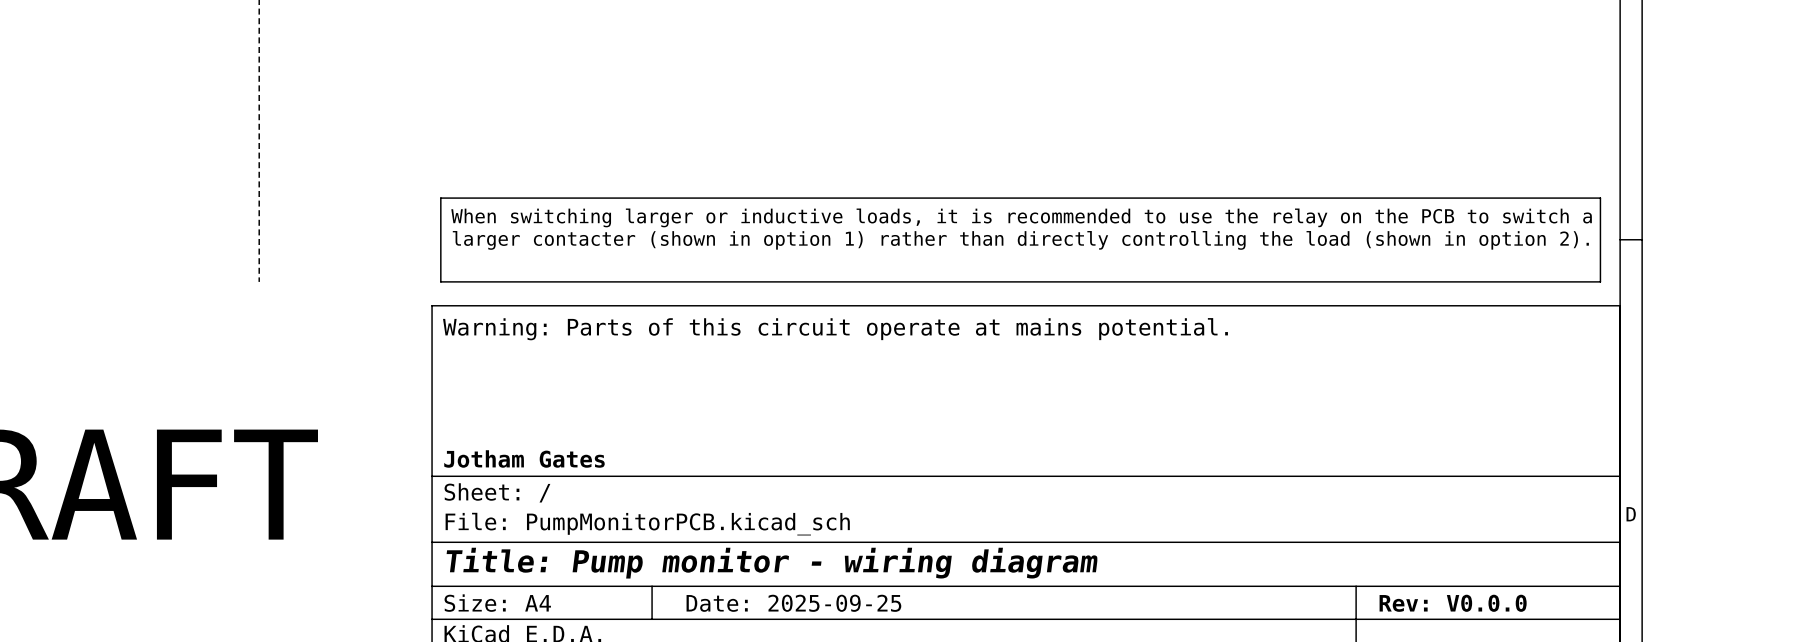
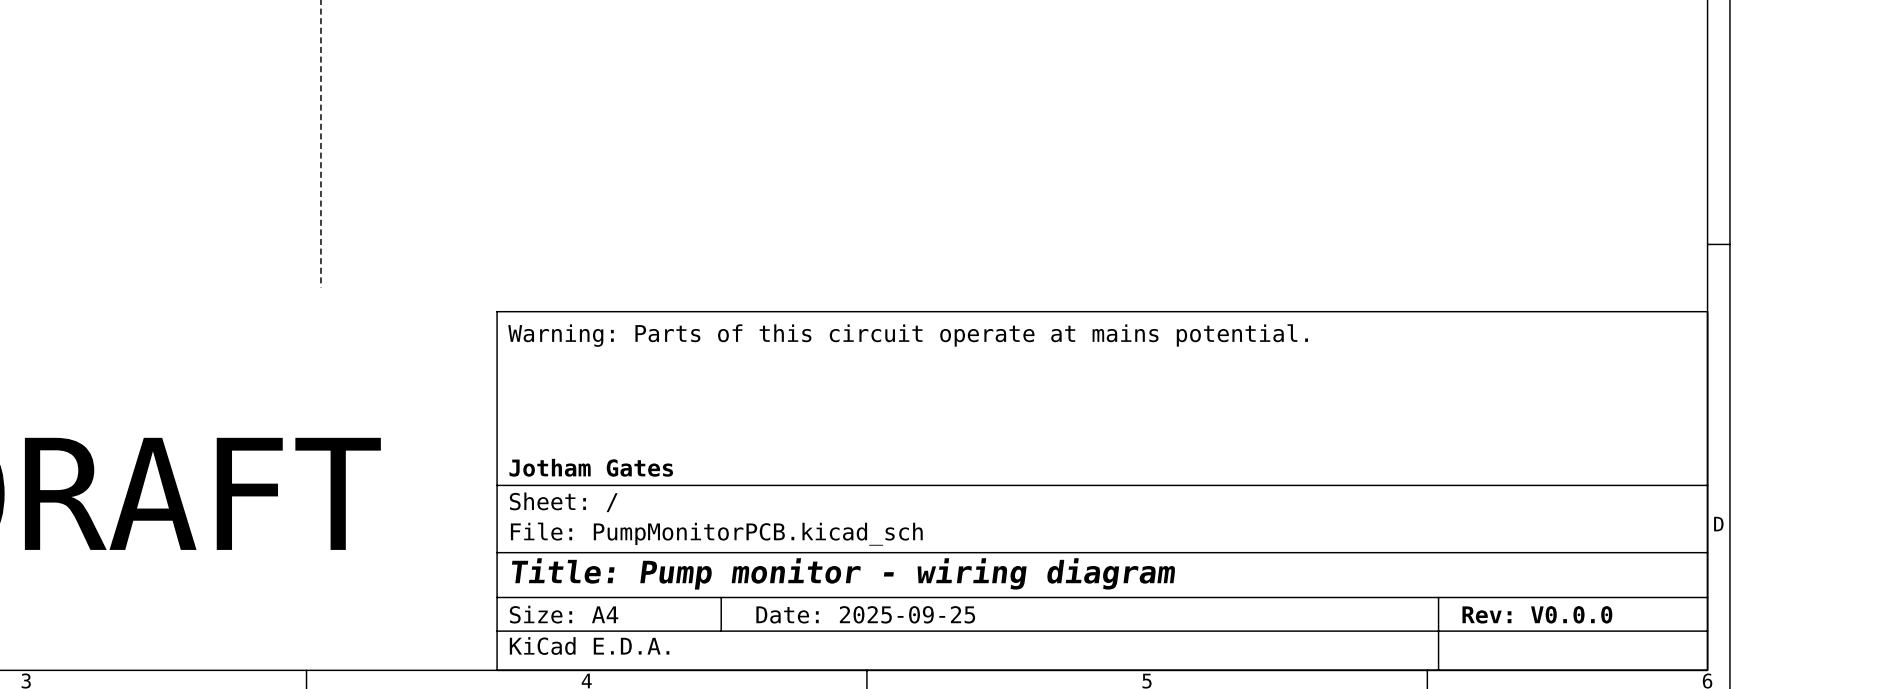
line: (440, 198) (1600, 198) (1600, 281) (440, 281) (440, 198) -> none
text: When switching larger or inductive loads, it is recommended to use the relay on the PCB to switch a (1021, 217) -> none
text: larger contacter (shown in option 1) rather than directly controlling the load (shown in option 2). (1020, 240) -> none

